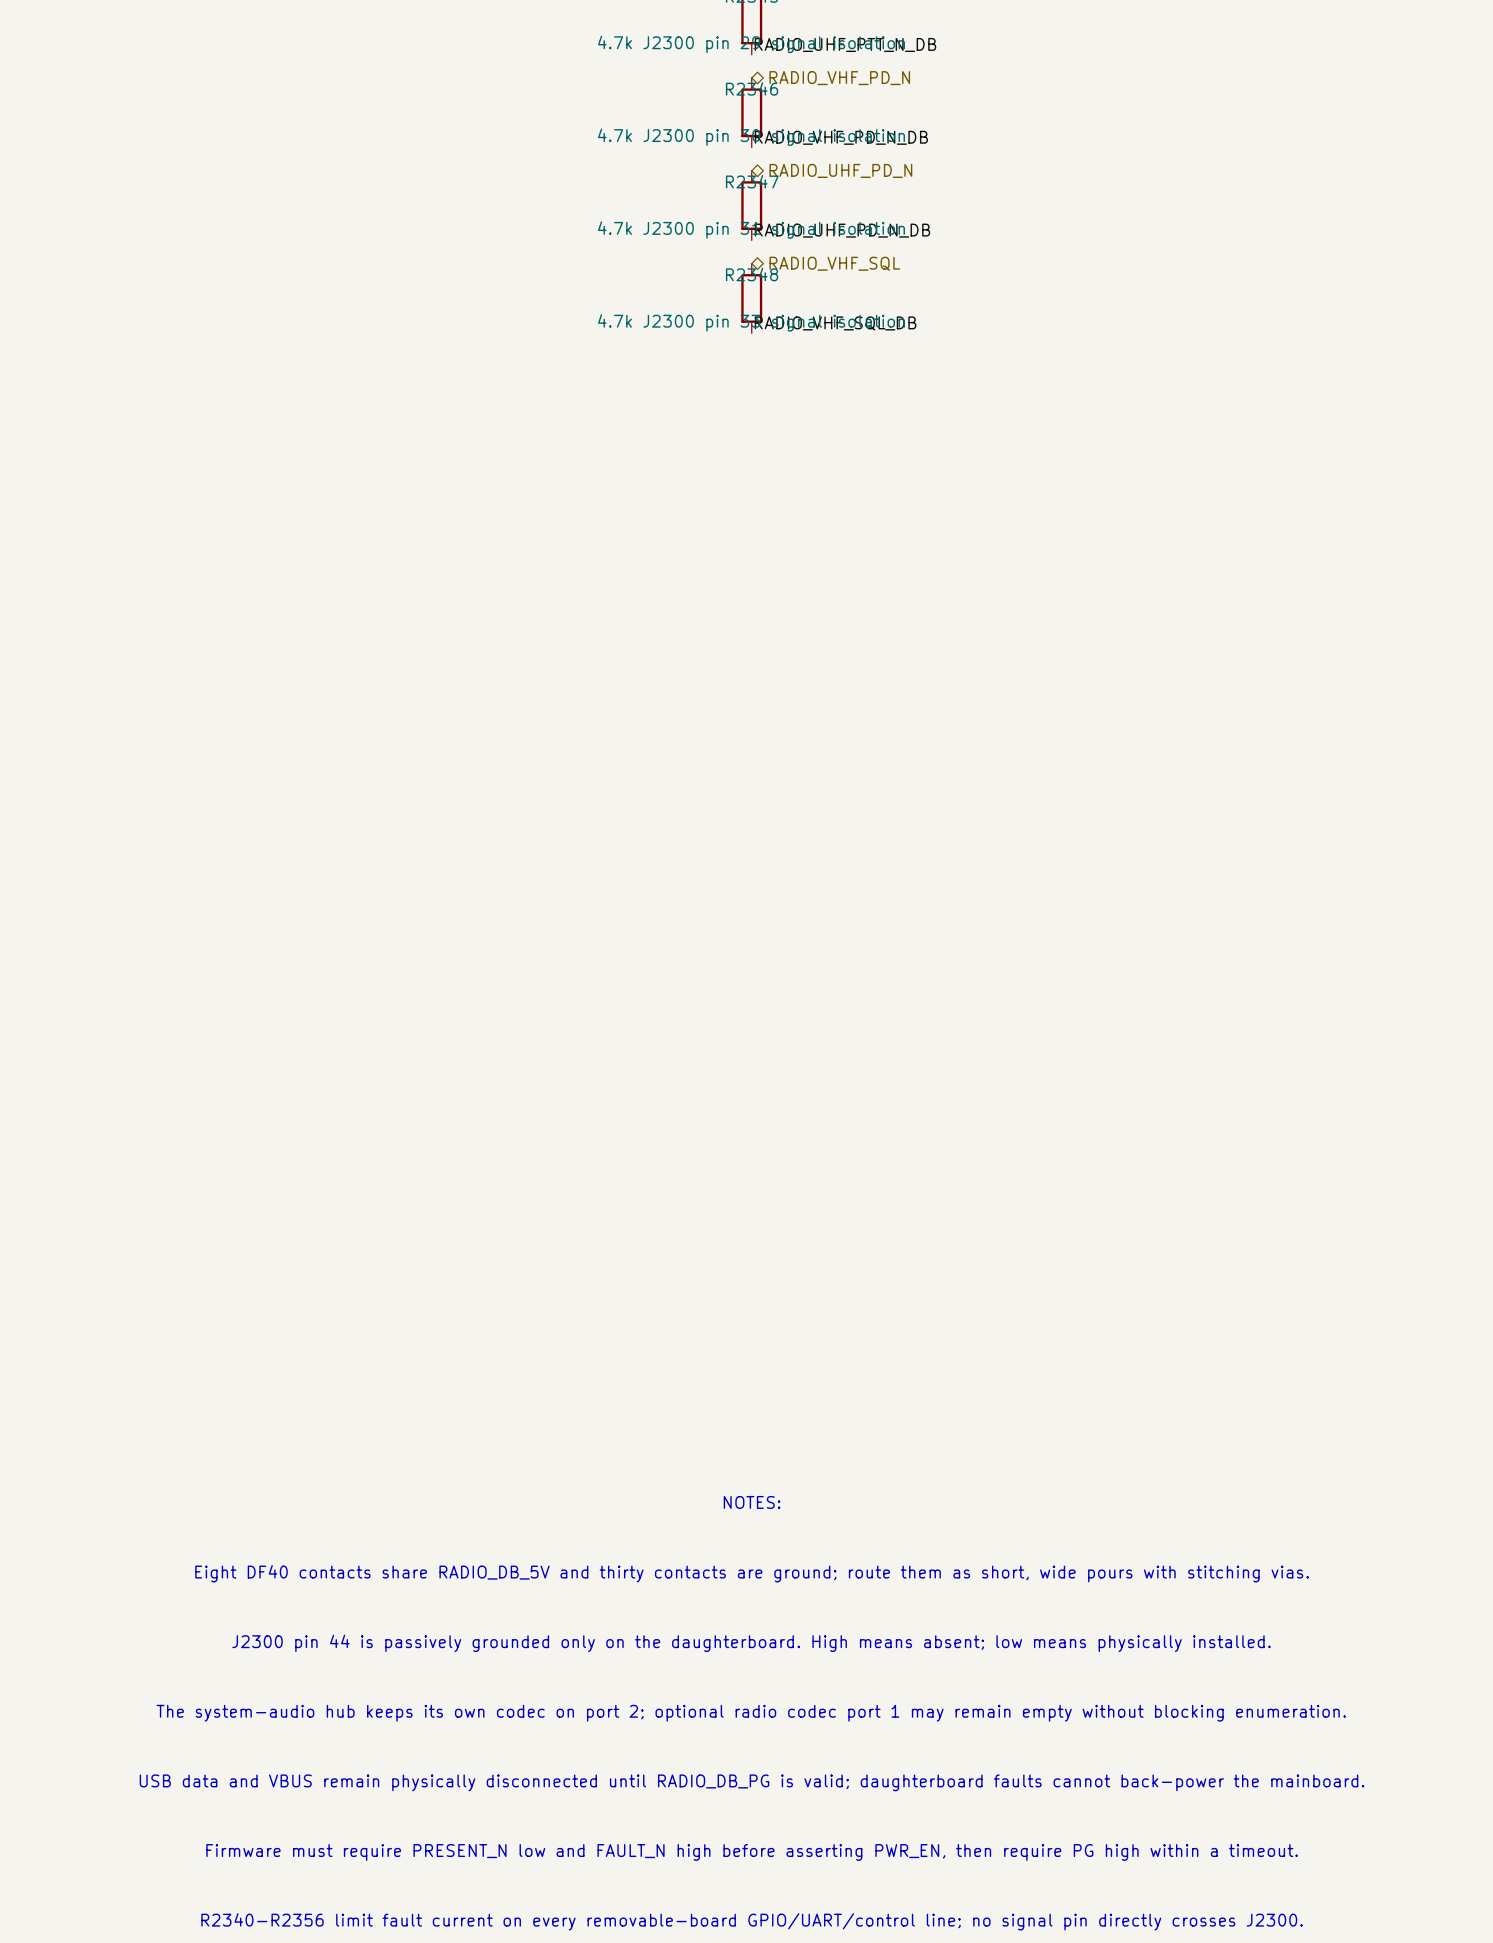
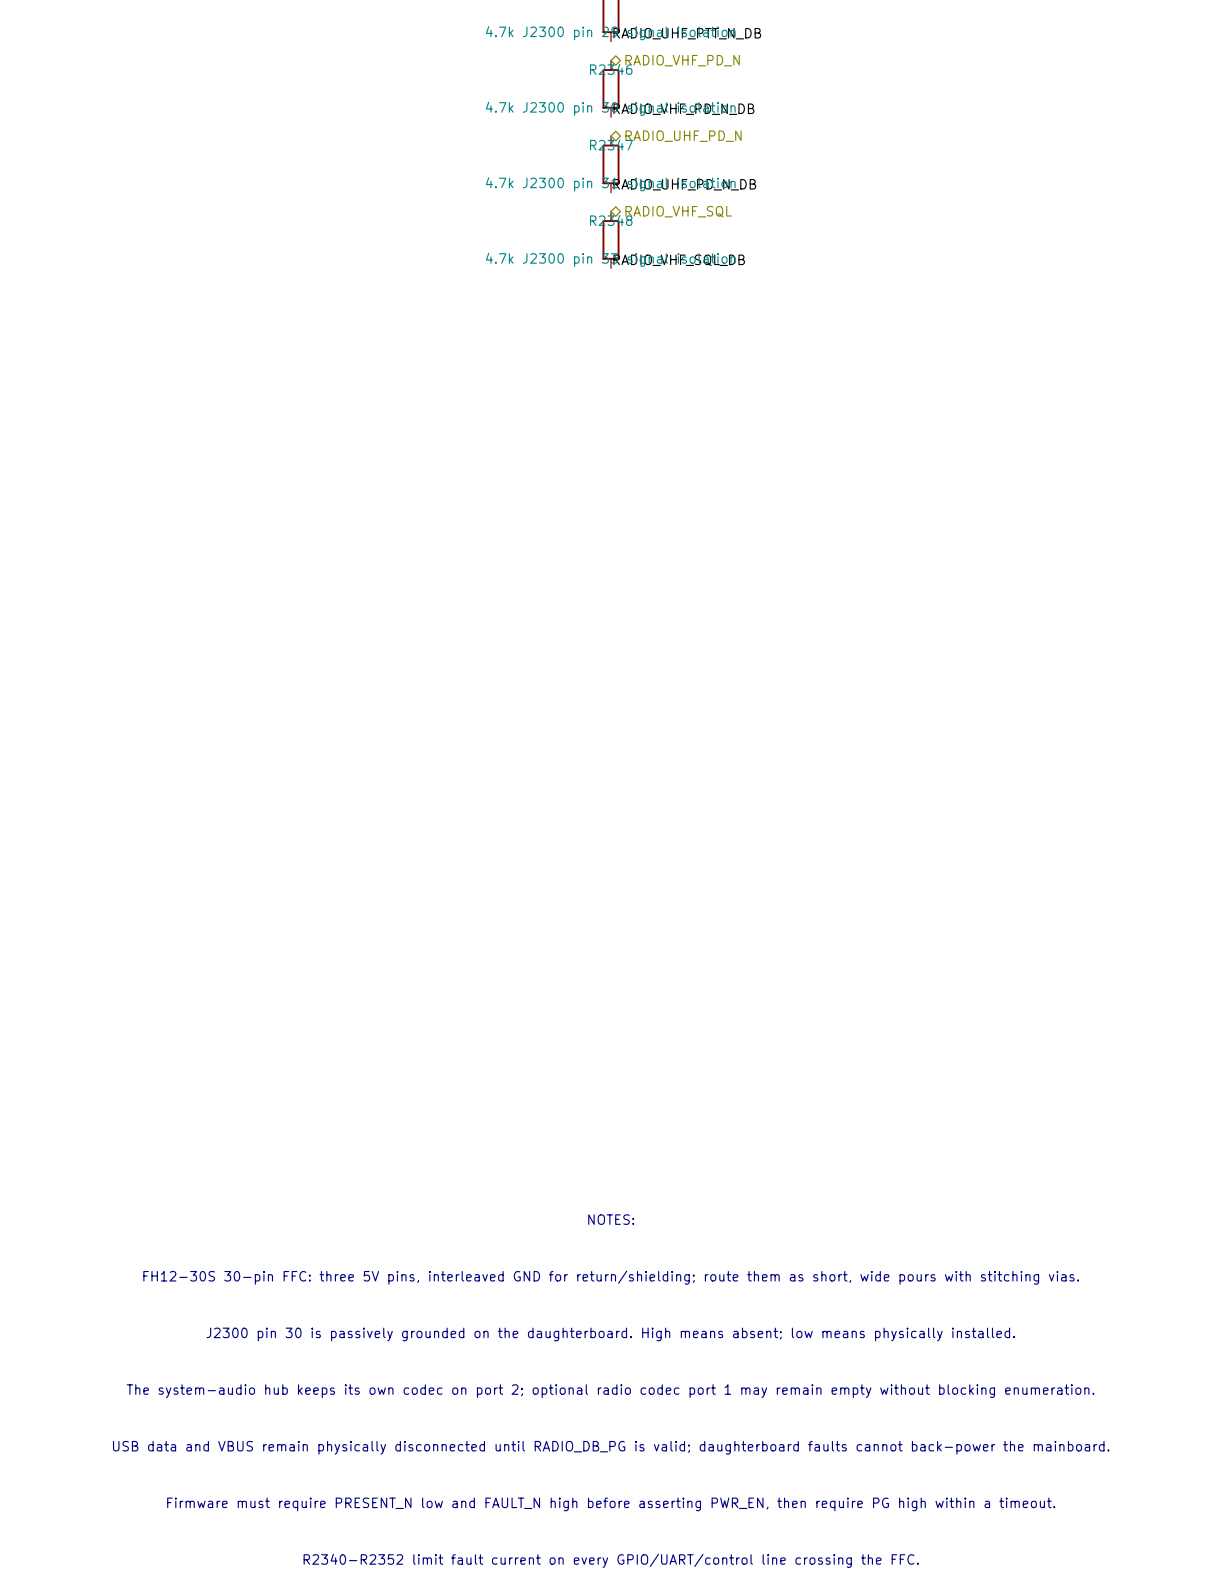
text: Eight DF40 contacts share RADIO_DB_5V and thirty contacts are ground; route them as short, wide pours with stitching vias. (752, 1573) -> FH12-30S 30-pin FFC: three 5V pins, interleaved GND for return/shielding; route them as short, wide pours with stitching vias. (611, 1277)
text: J2300 pin 44 is passively grounded only on the daughterboard. High means absent; low means physically installed. (751, 1643) -> J2300 pin 30 is passively grounded on the daughterboard. High means absent; low means physically installed. (610, 1334)
text: R2340-R2356 limit fault current on every removable-board GPIO/UART/control line; no signal pin directly crosses J2300. (752, 1921) -> R2340-R2352 limit fault current on every GPIO/UART/control line crossing the FFC. (611, 1560)

